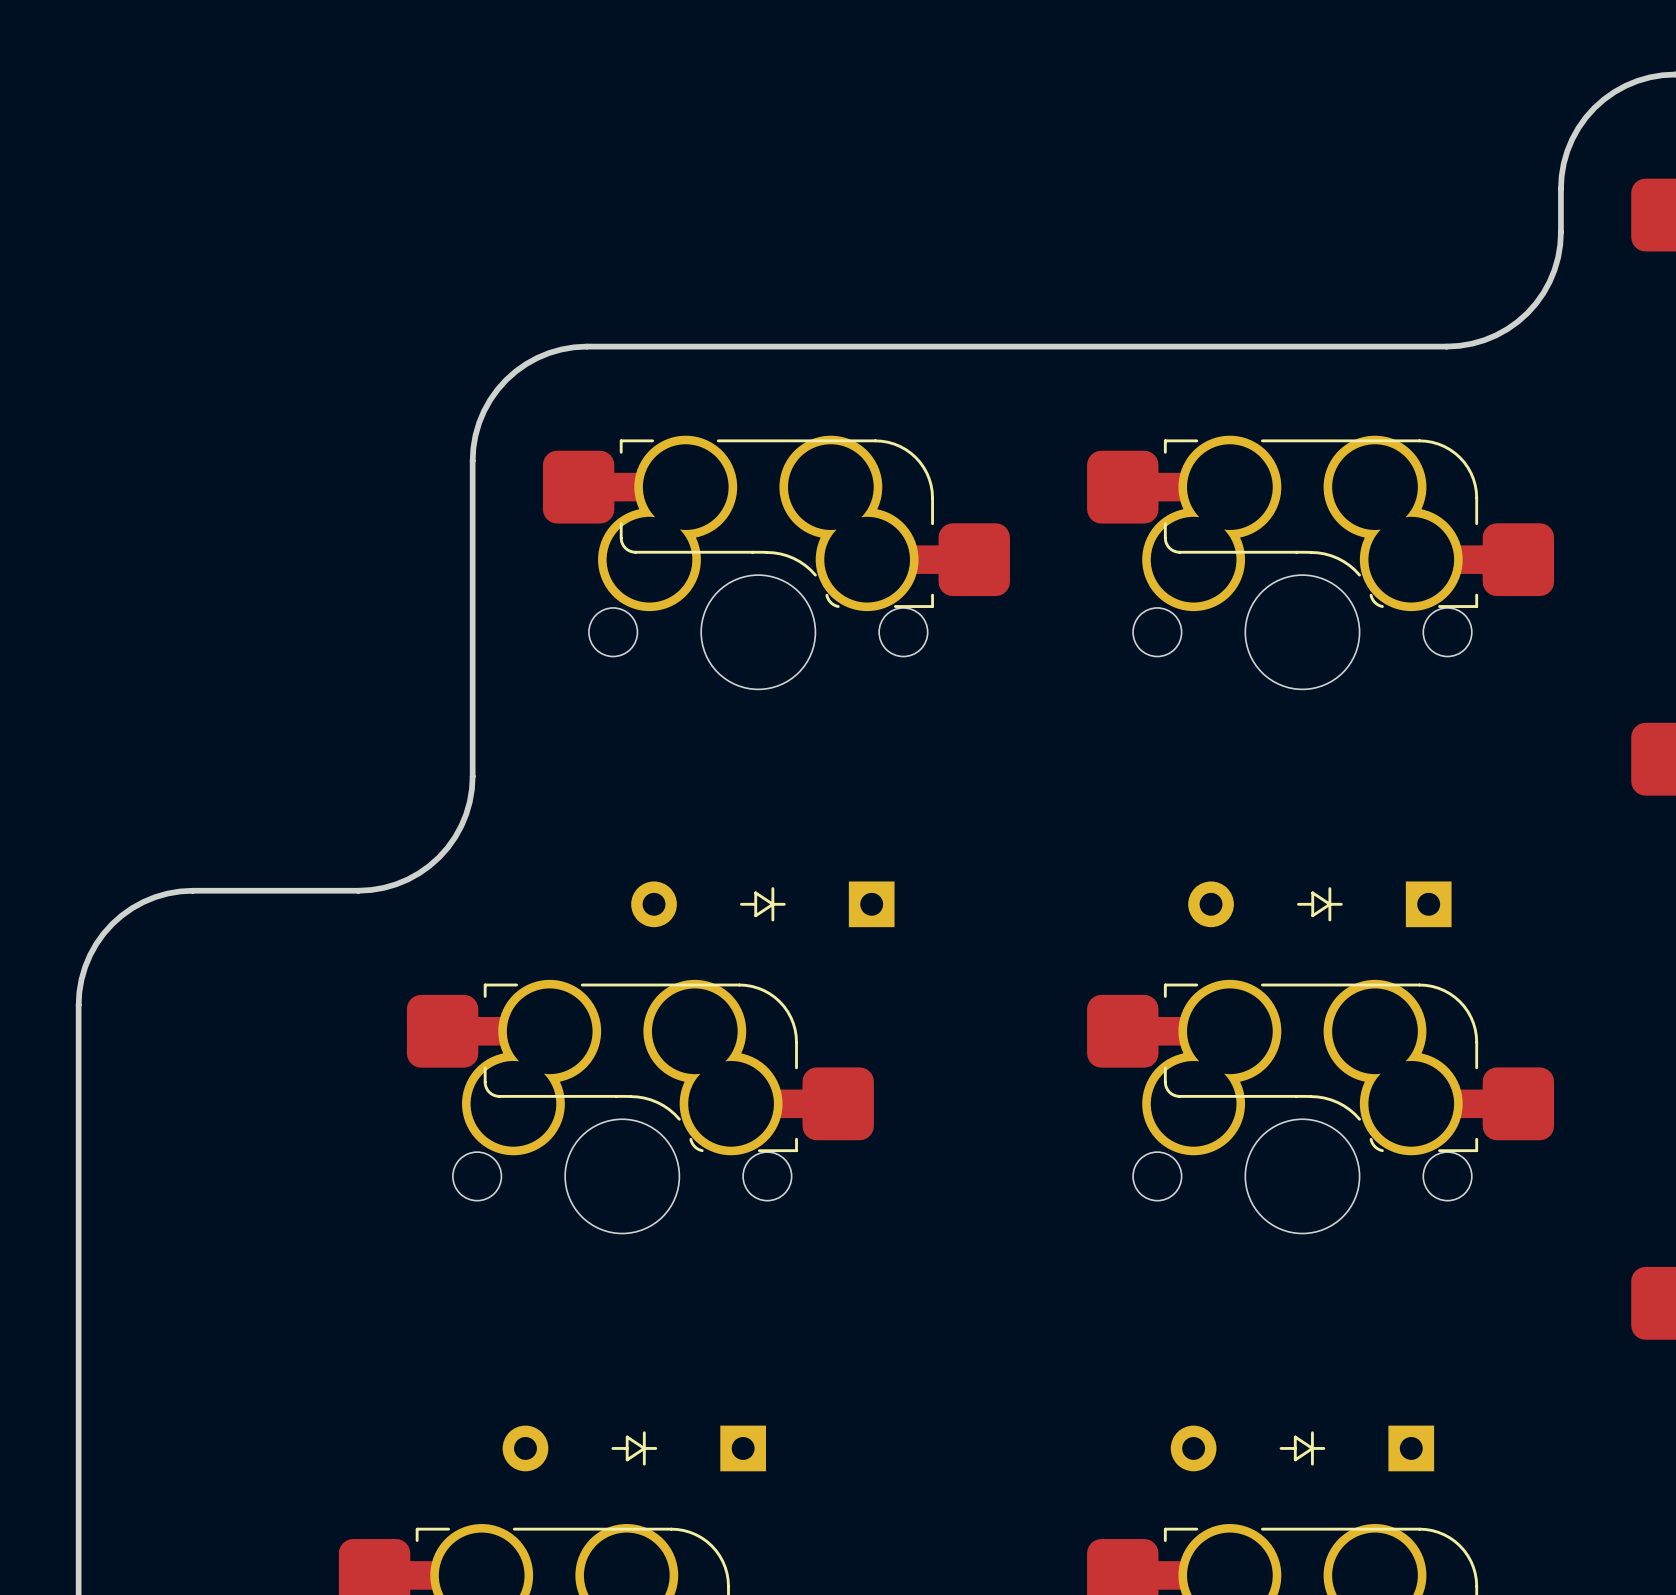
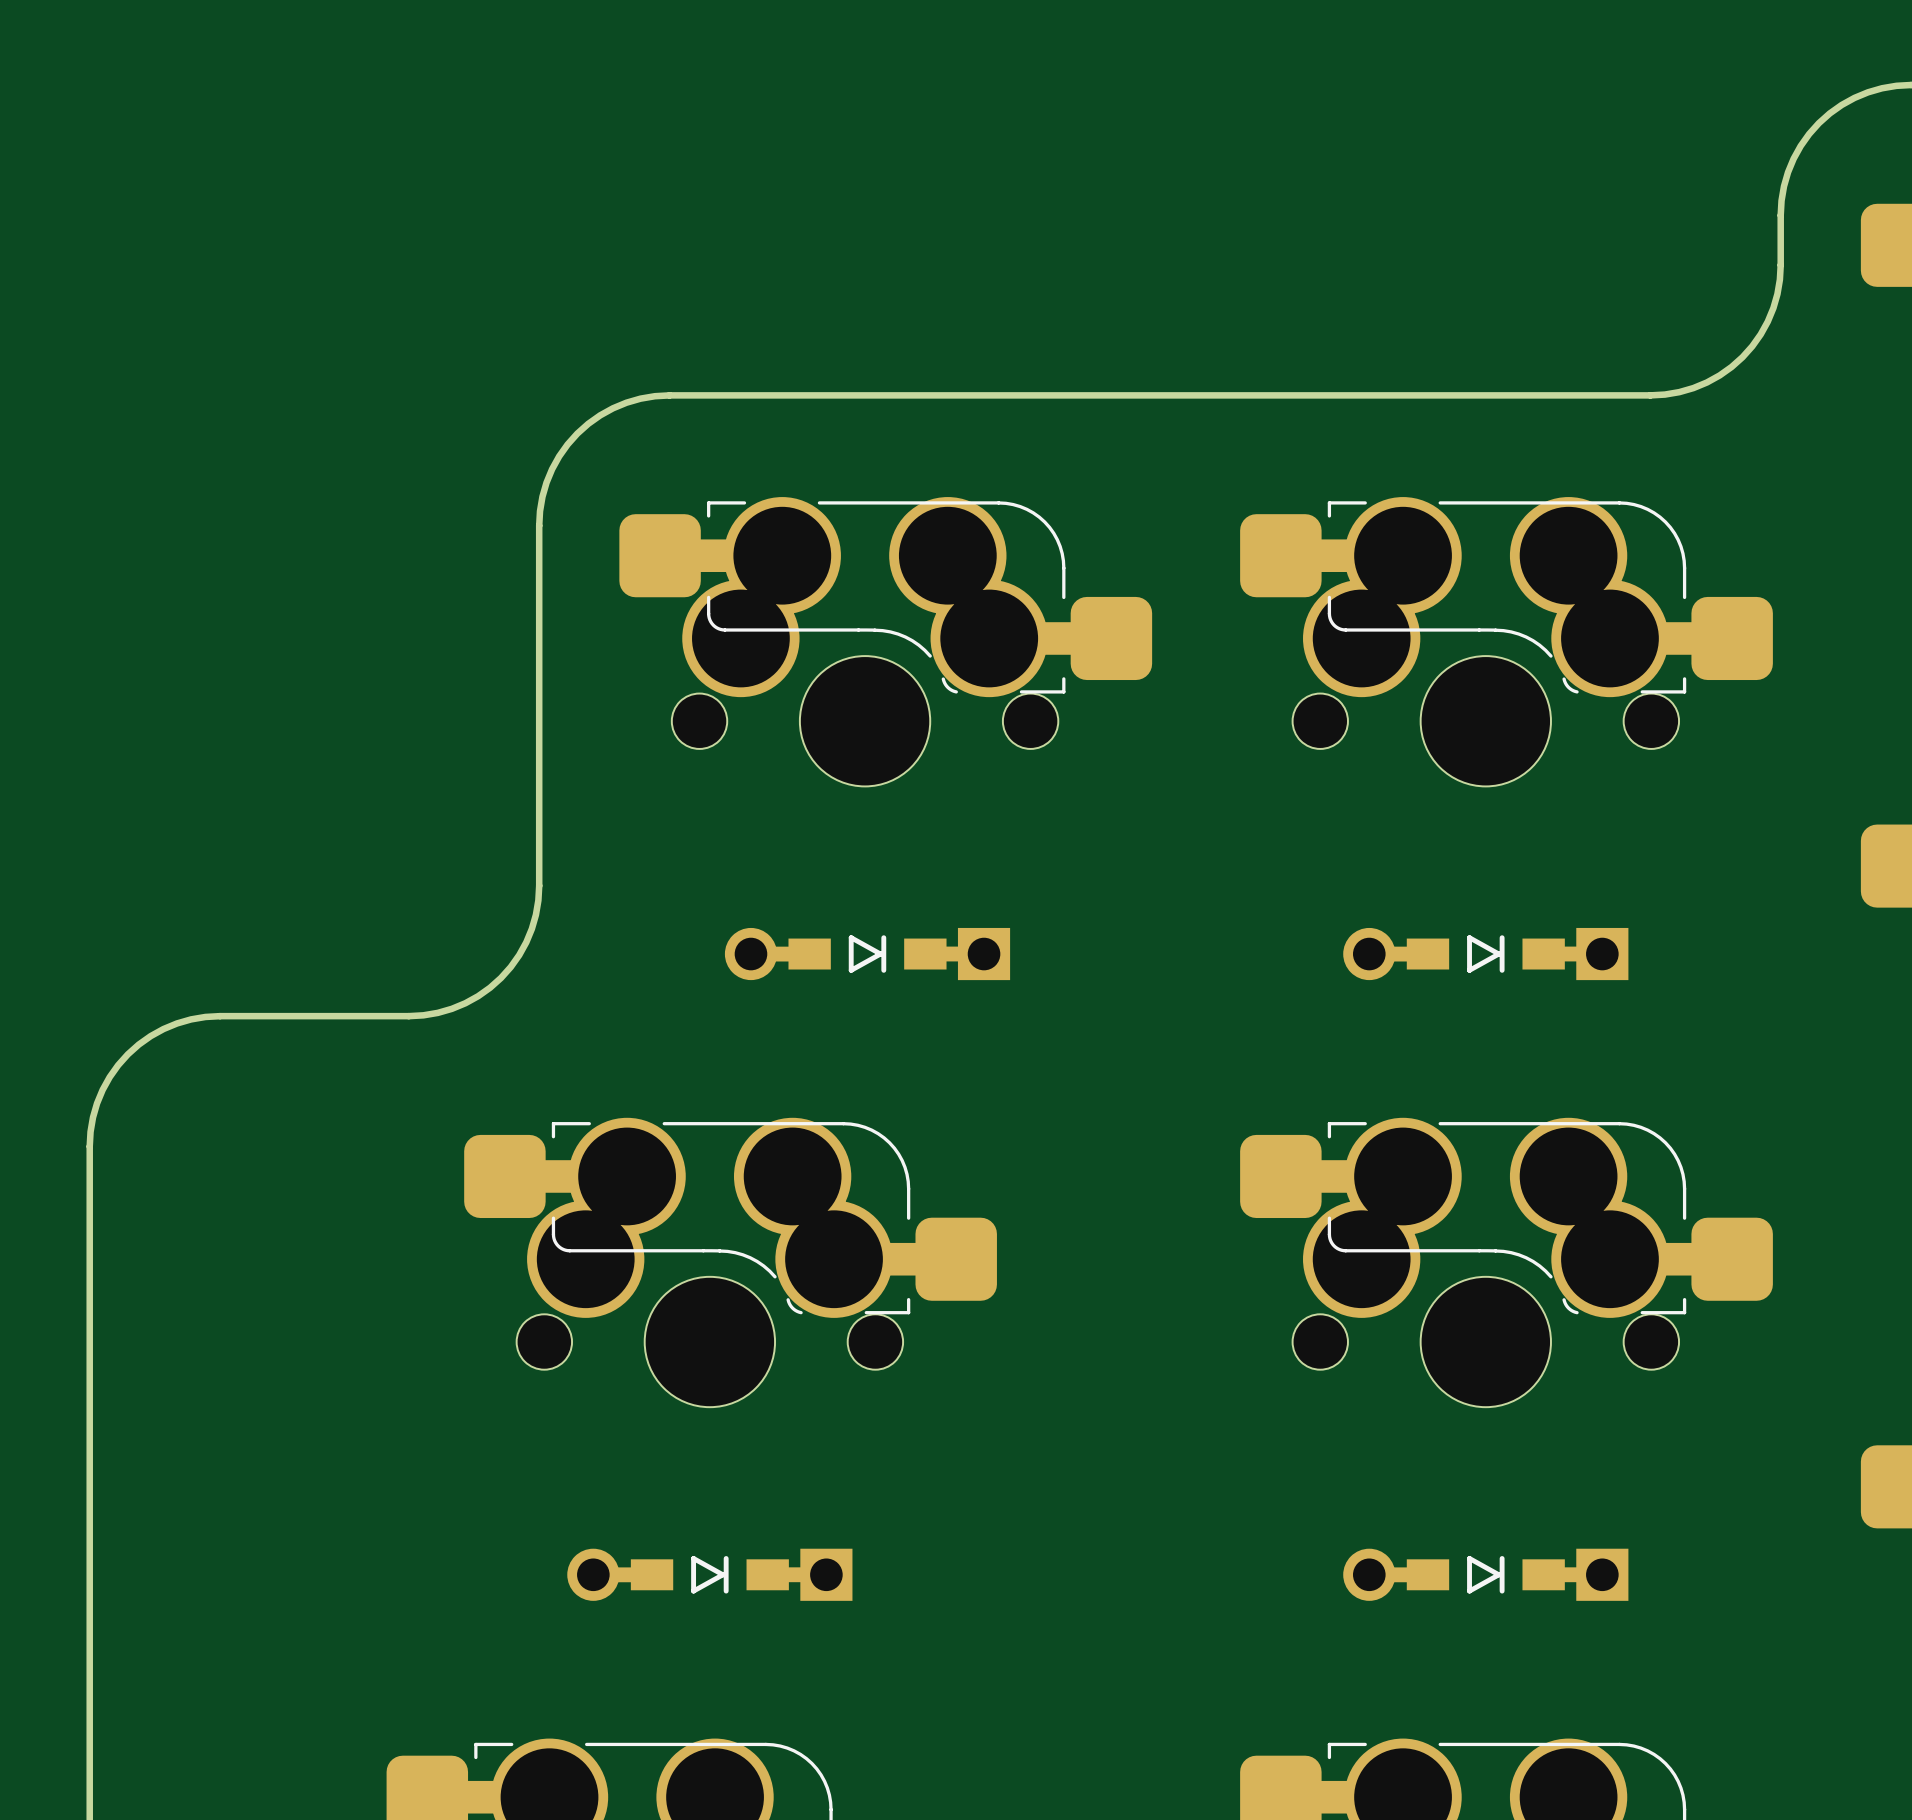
part: none -> (867, 954)
part: none -> (1485, 954)
part: (762, 904) -> none
part: (1319, 904) -> none
part: none -> (709, 1574)
part: none -> (1485, 1574)
part: (634, 1448) -> none
part: (1302, 1448) -> none

